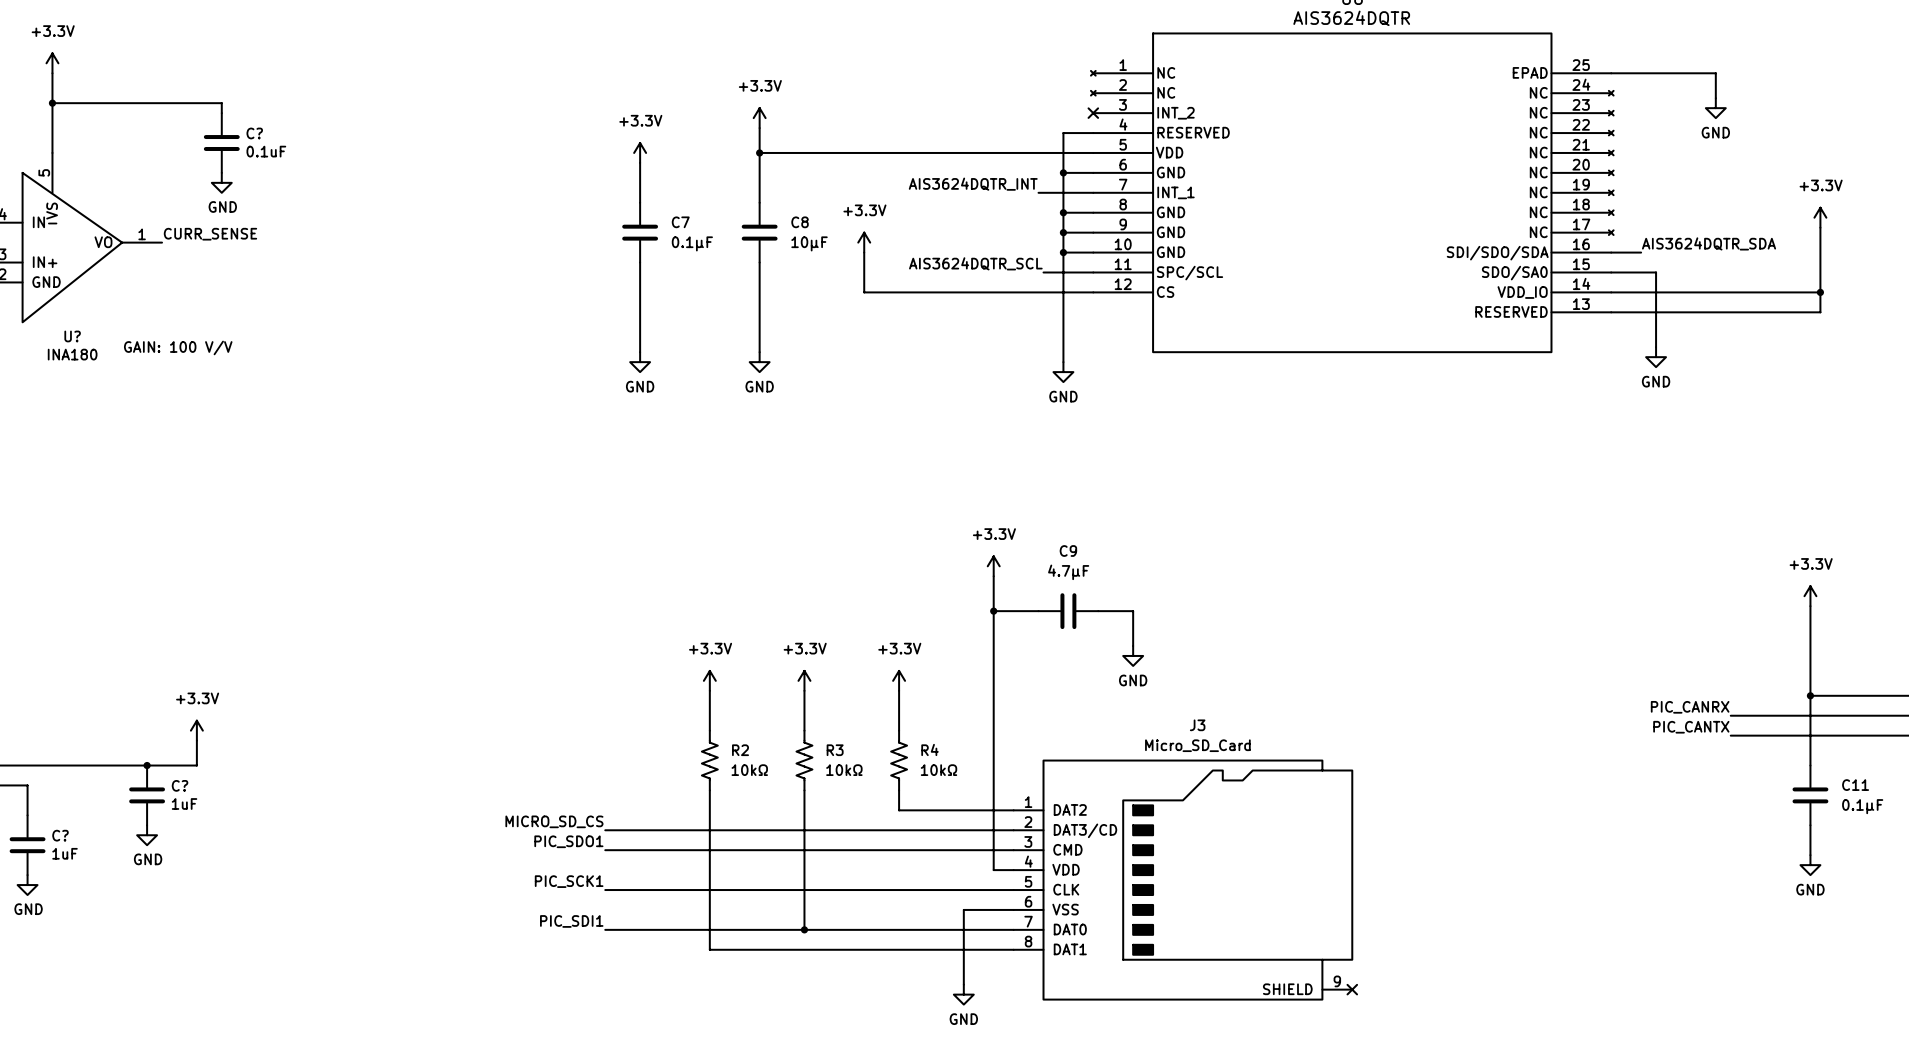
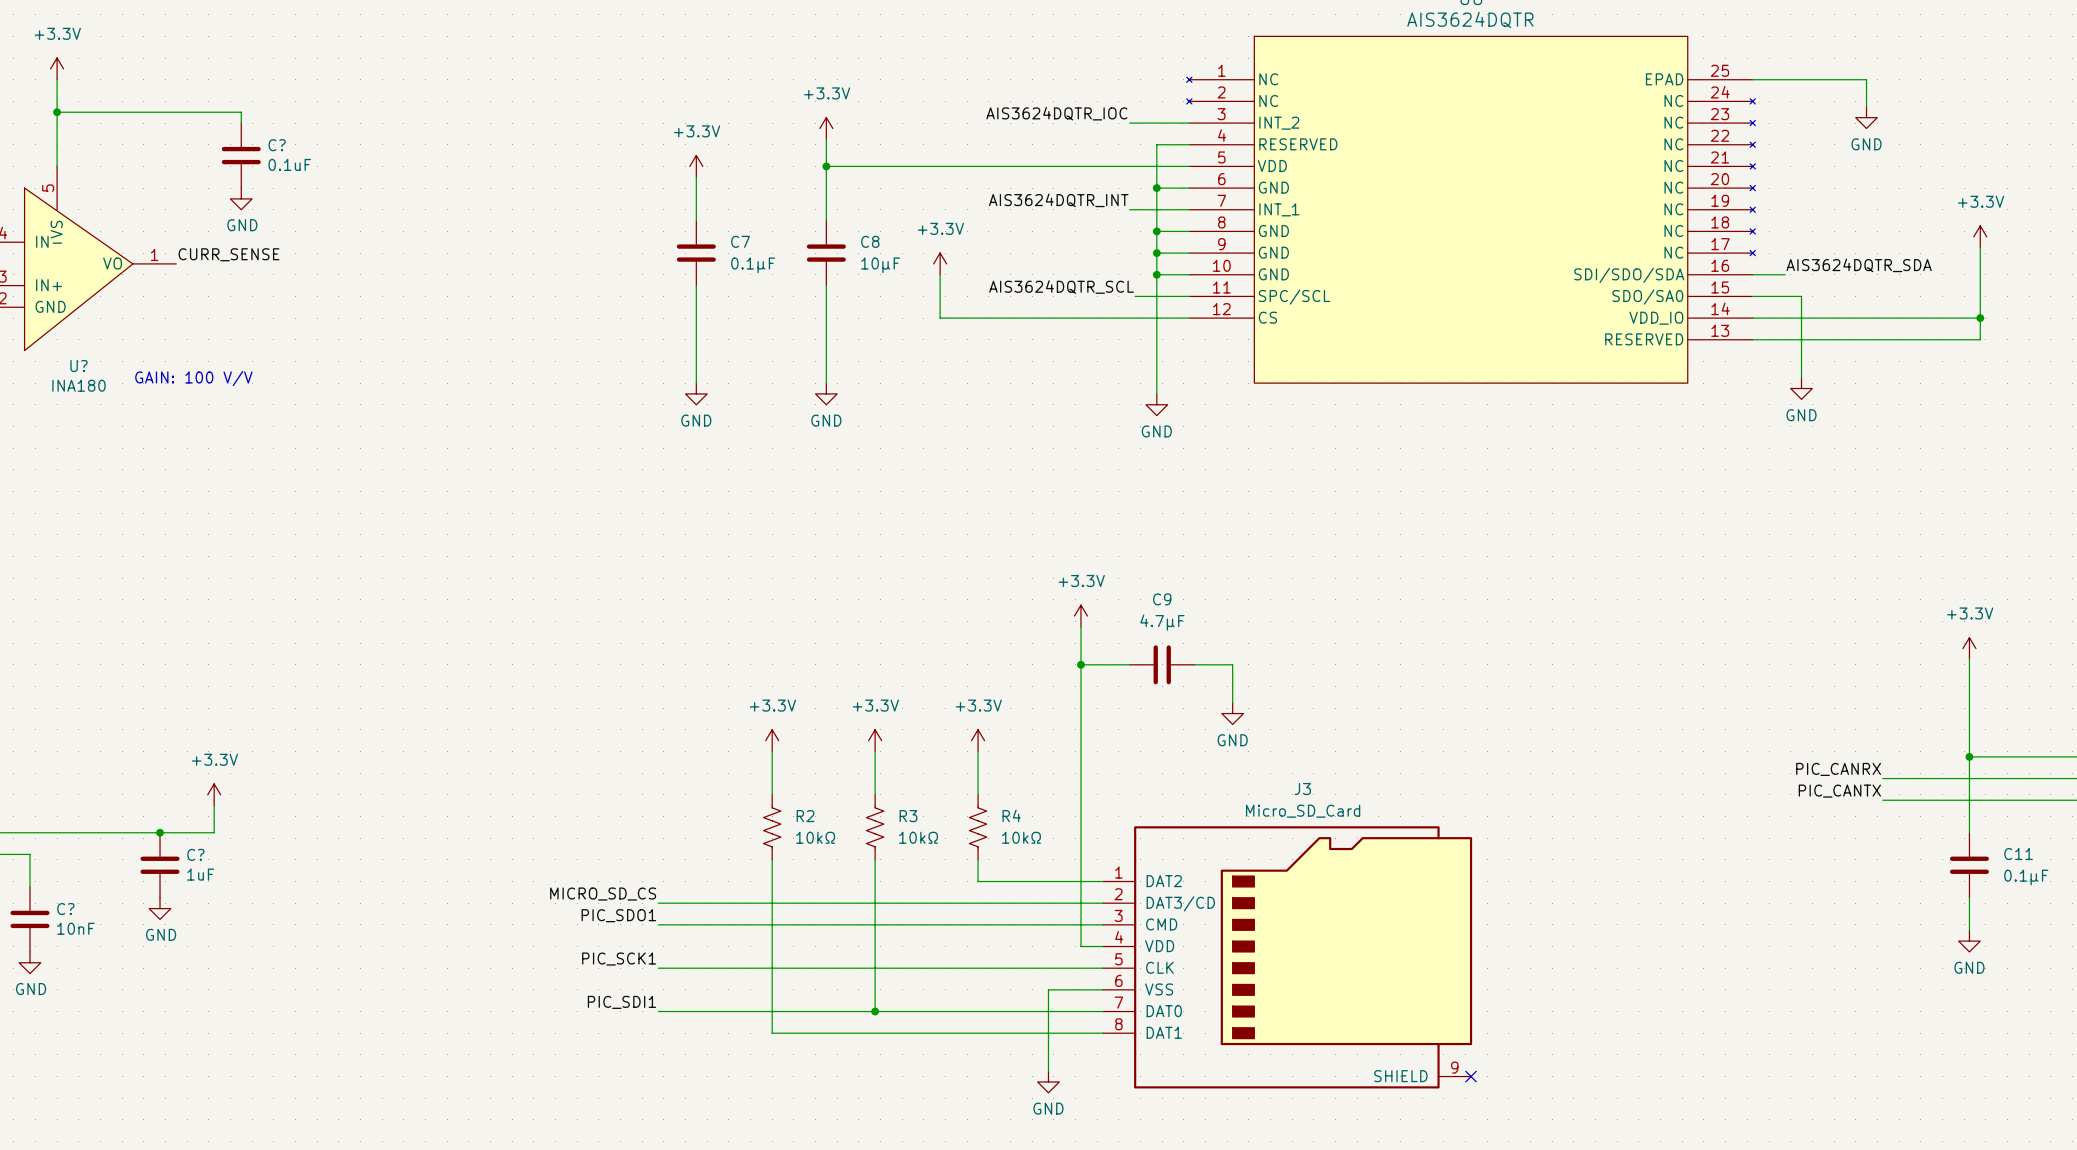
label: none -> AIS3624DQTR_IOC (1056, 113)
wire: none -> (1129, 123) (1189, 123)
no-connect mark: (1093, 113) -> none
C? value: 1uF (65, 853) -> 10nF (75, 928)

